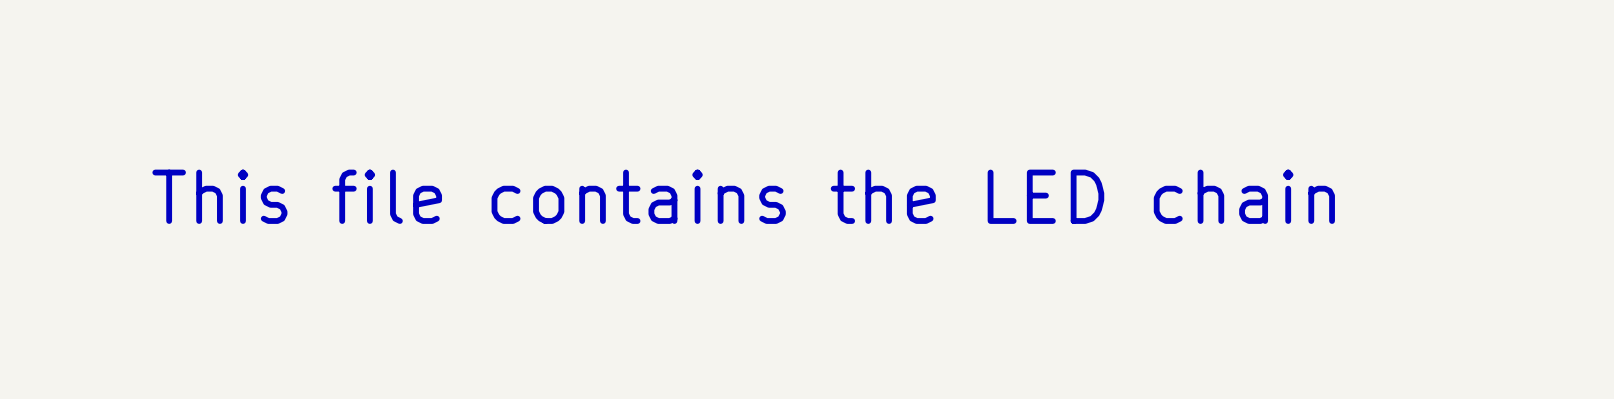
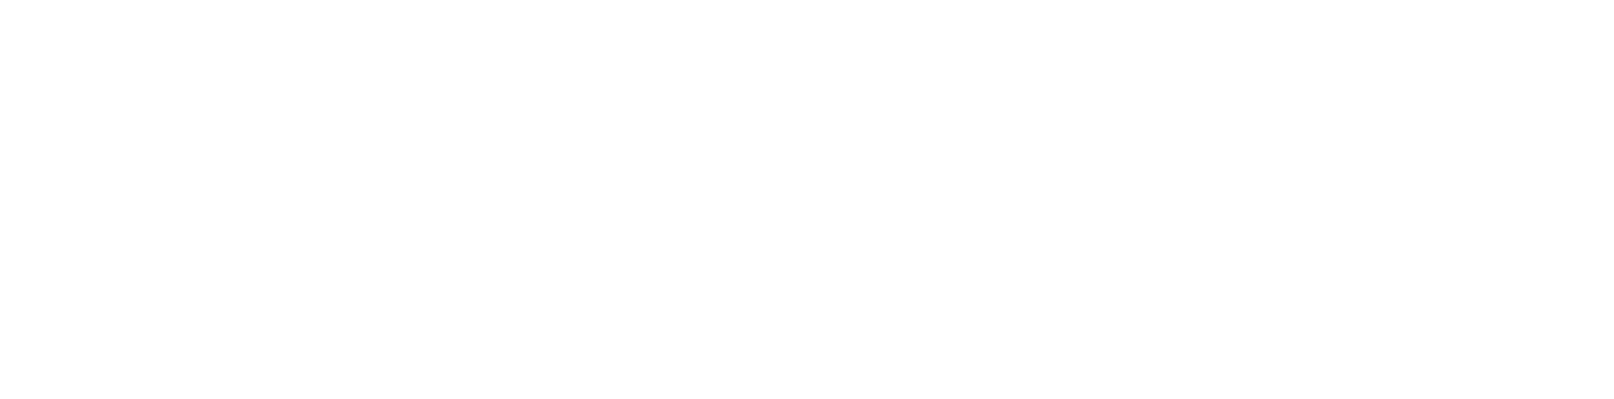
text: This file contains the LED chain (743, 196) -> none

